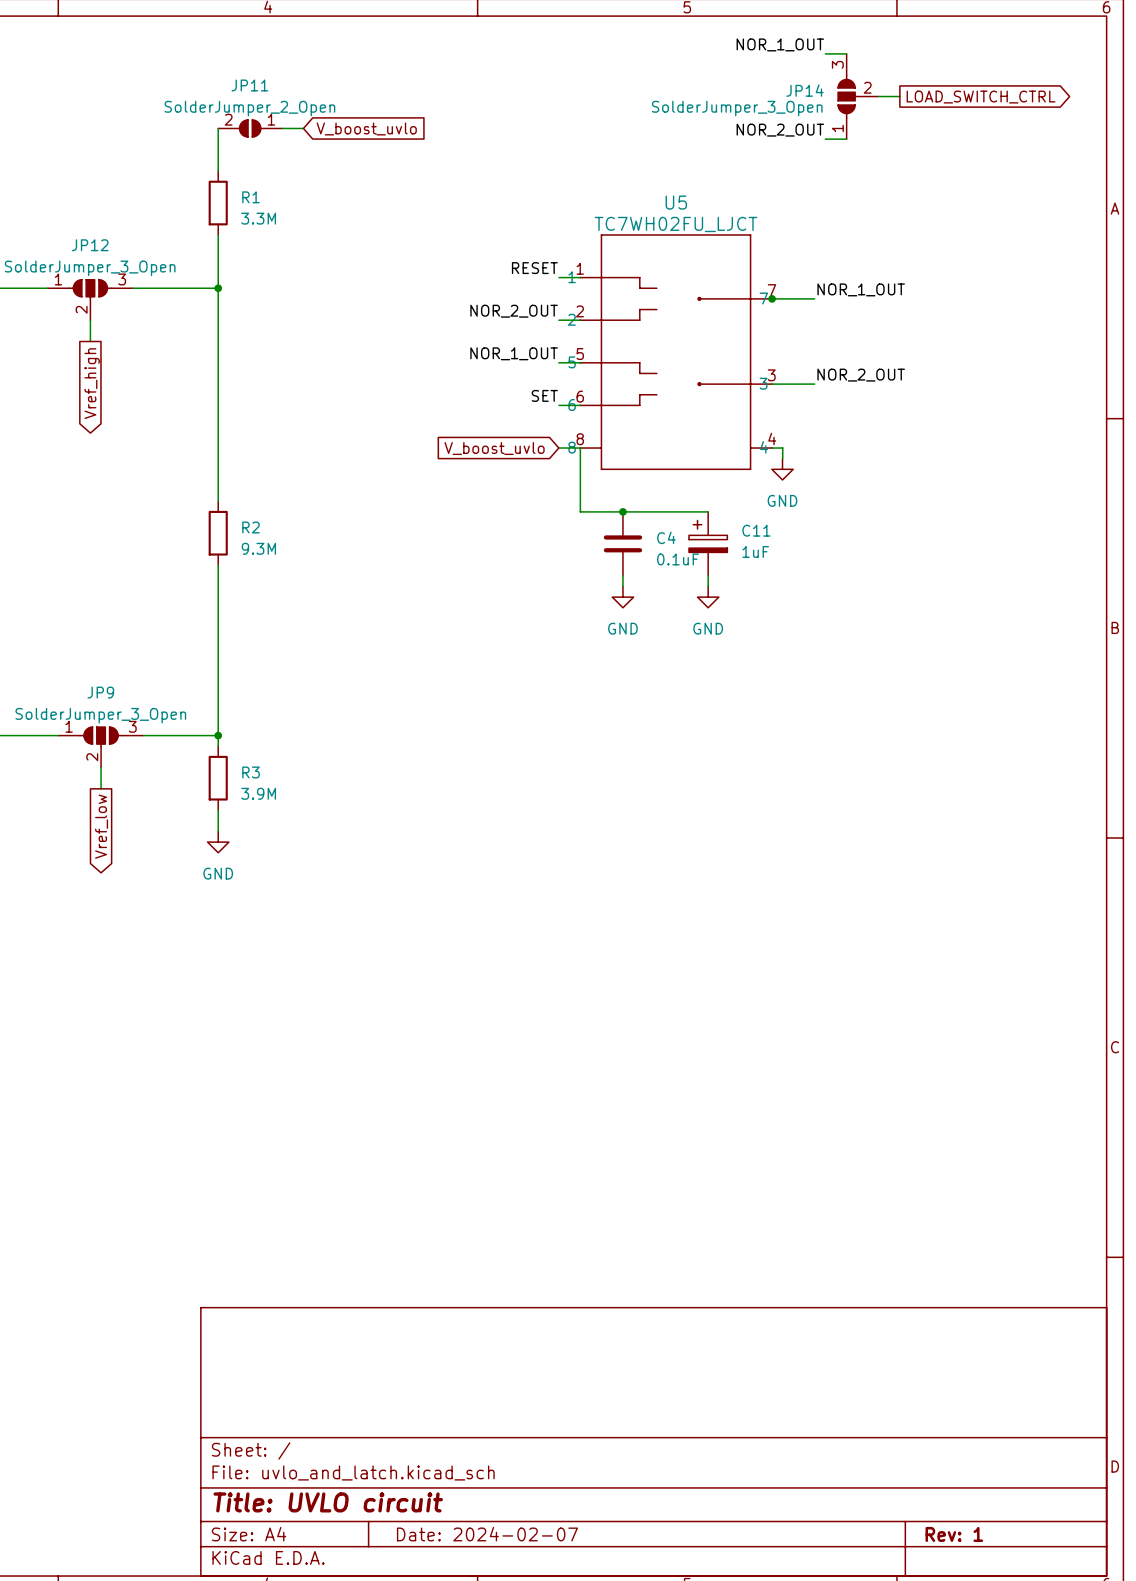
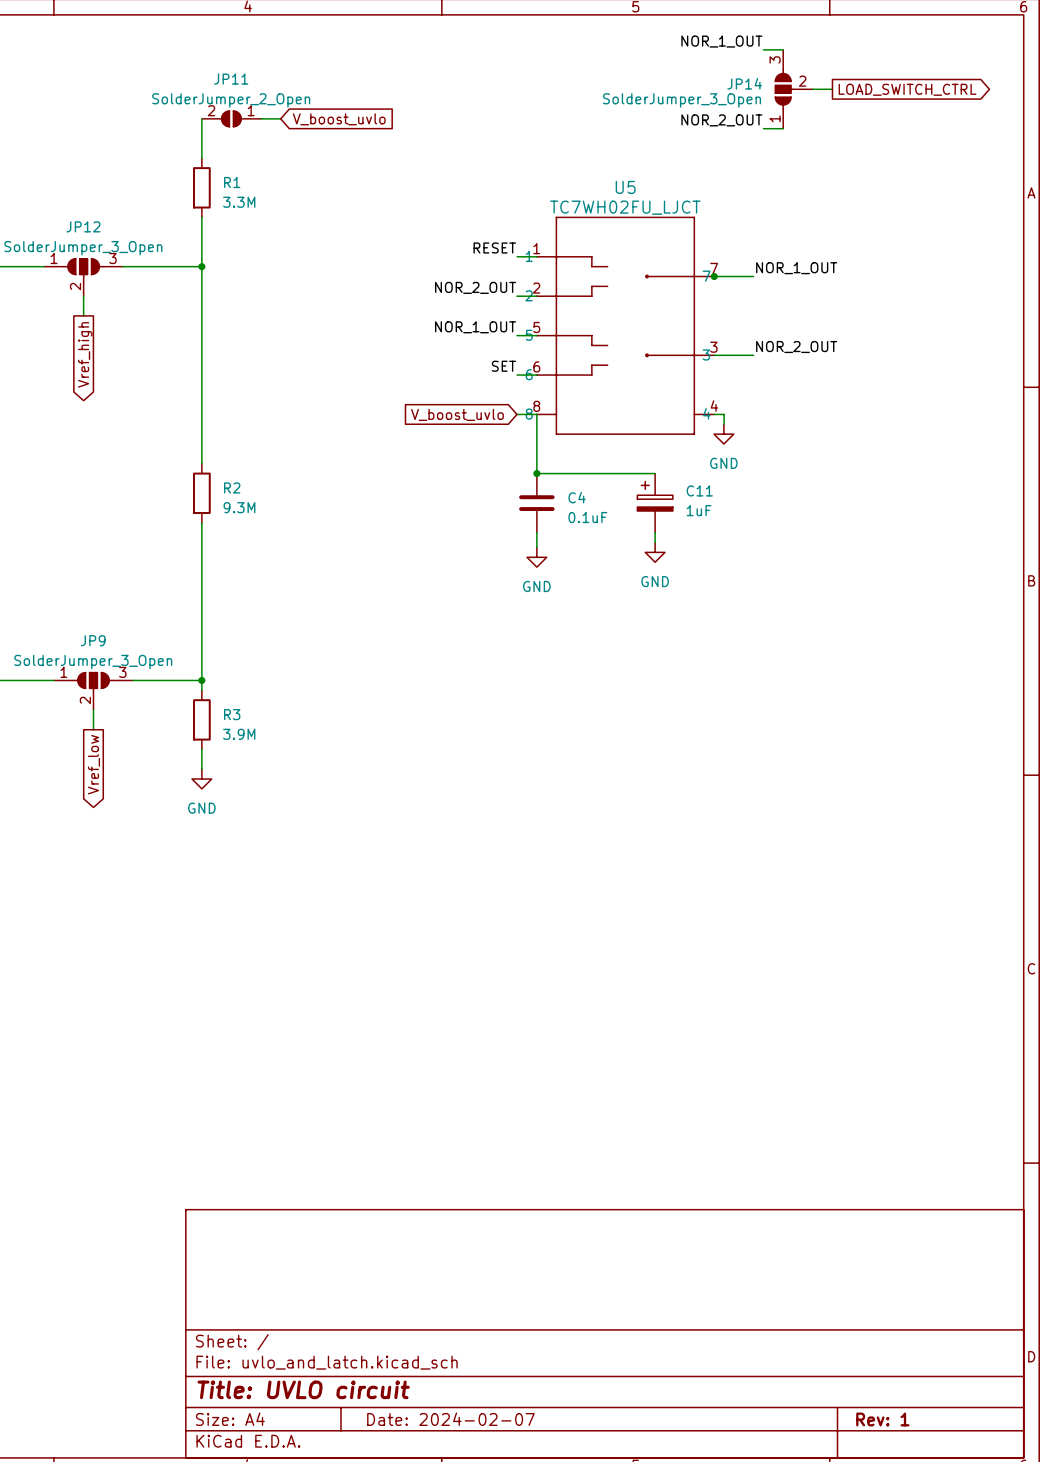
junction position: (622, 511) -> (536, 473)
C4 position: (622, 543) -> (536, 503)
wire: none -> (536, 532) (536, 547)
wire: (622, 575) (622, 586) -> none
power symbol position: GND (622, 597) -> GND (536, 557)

